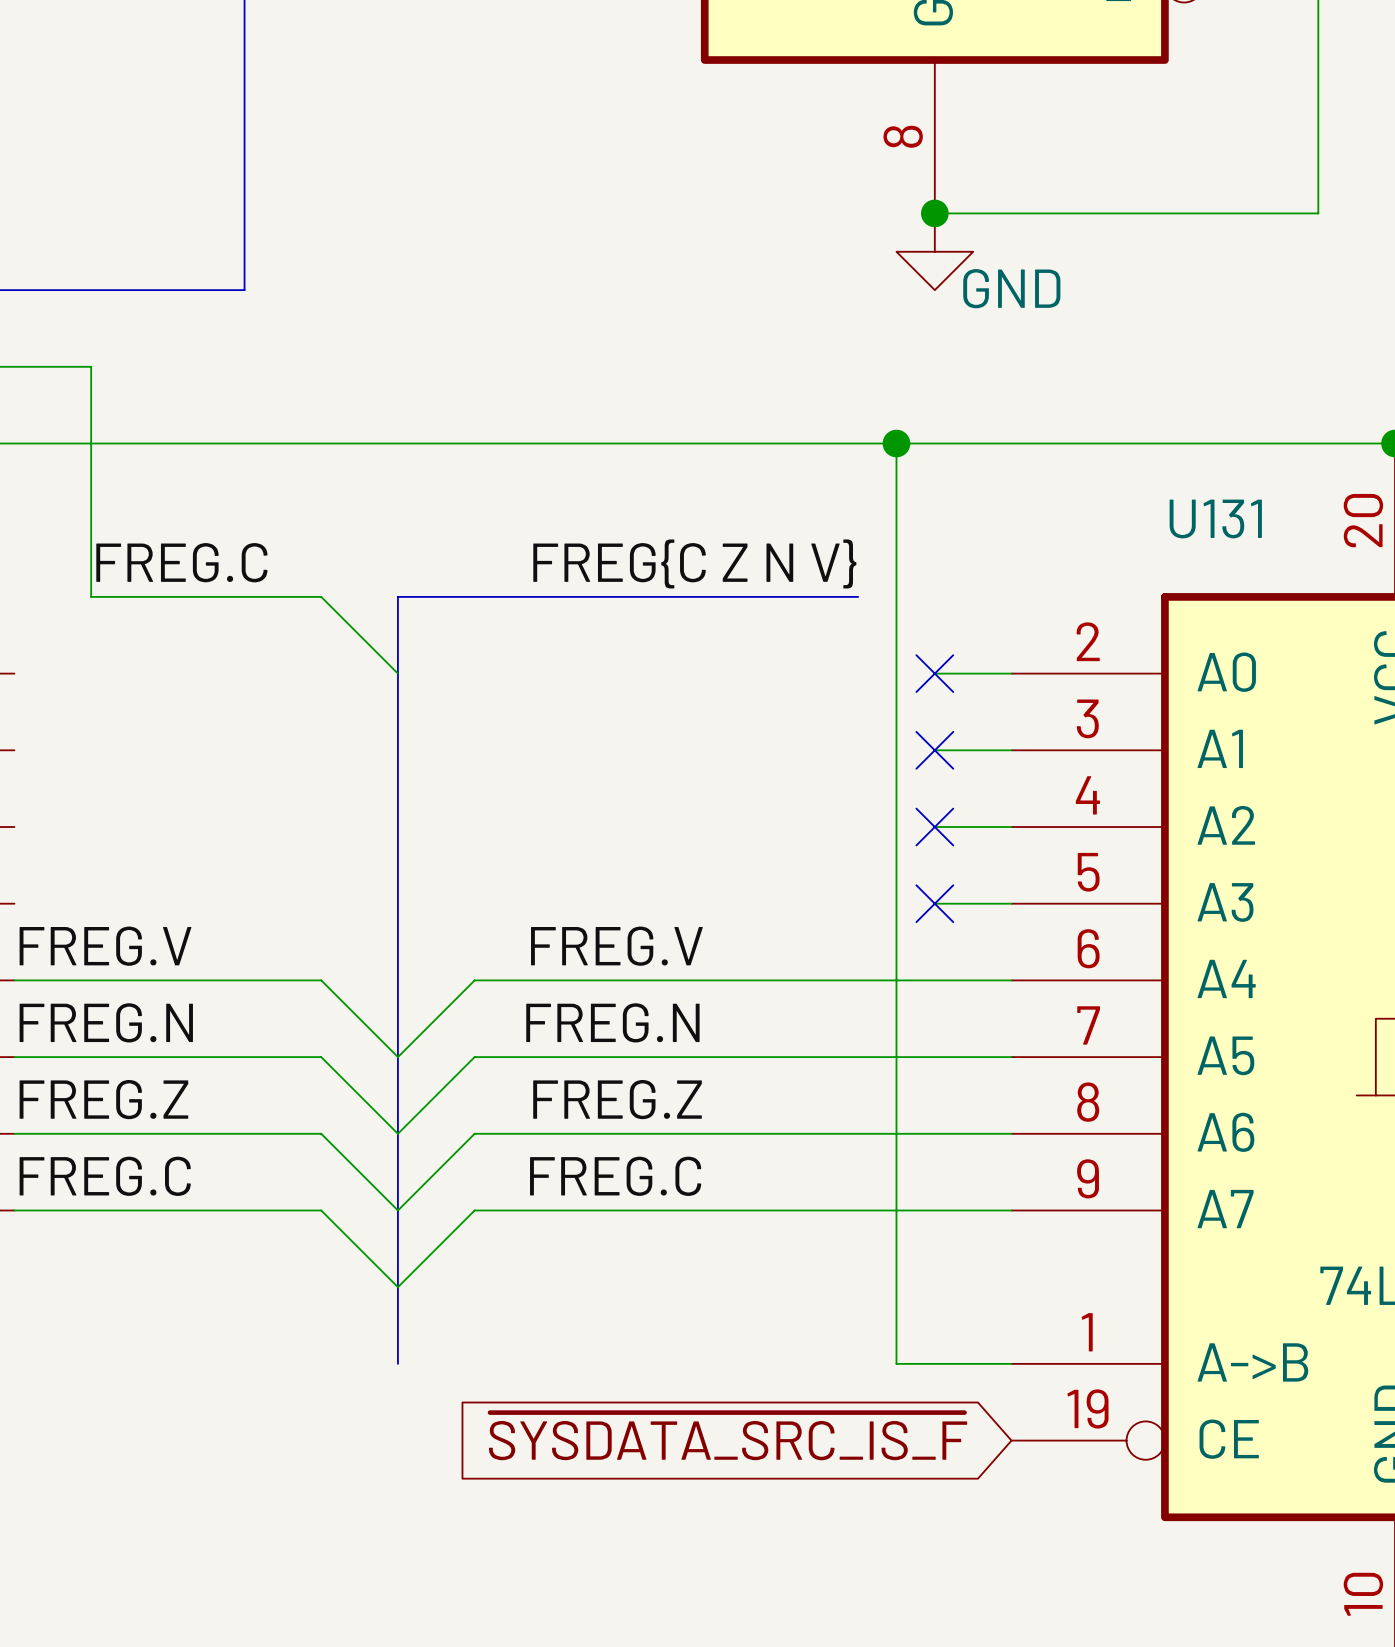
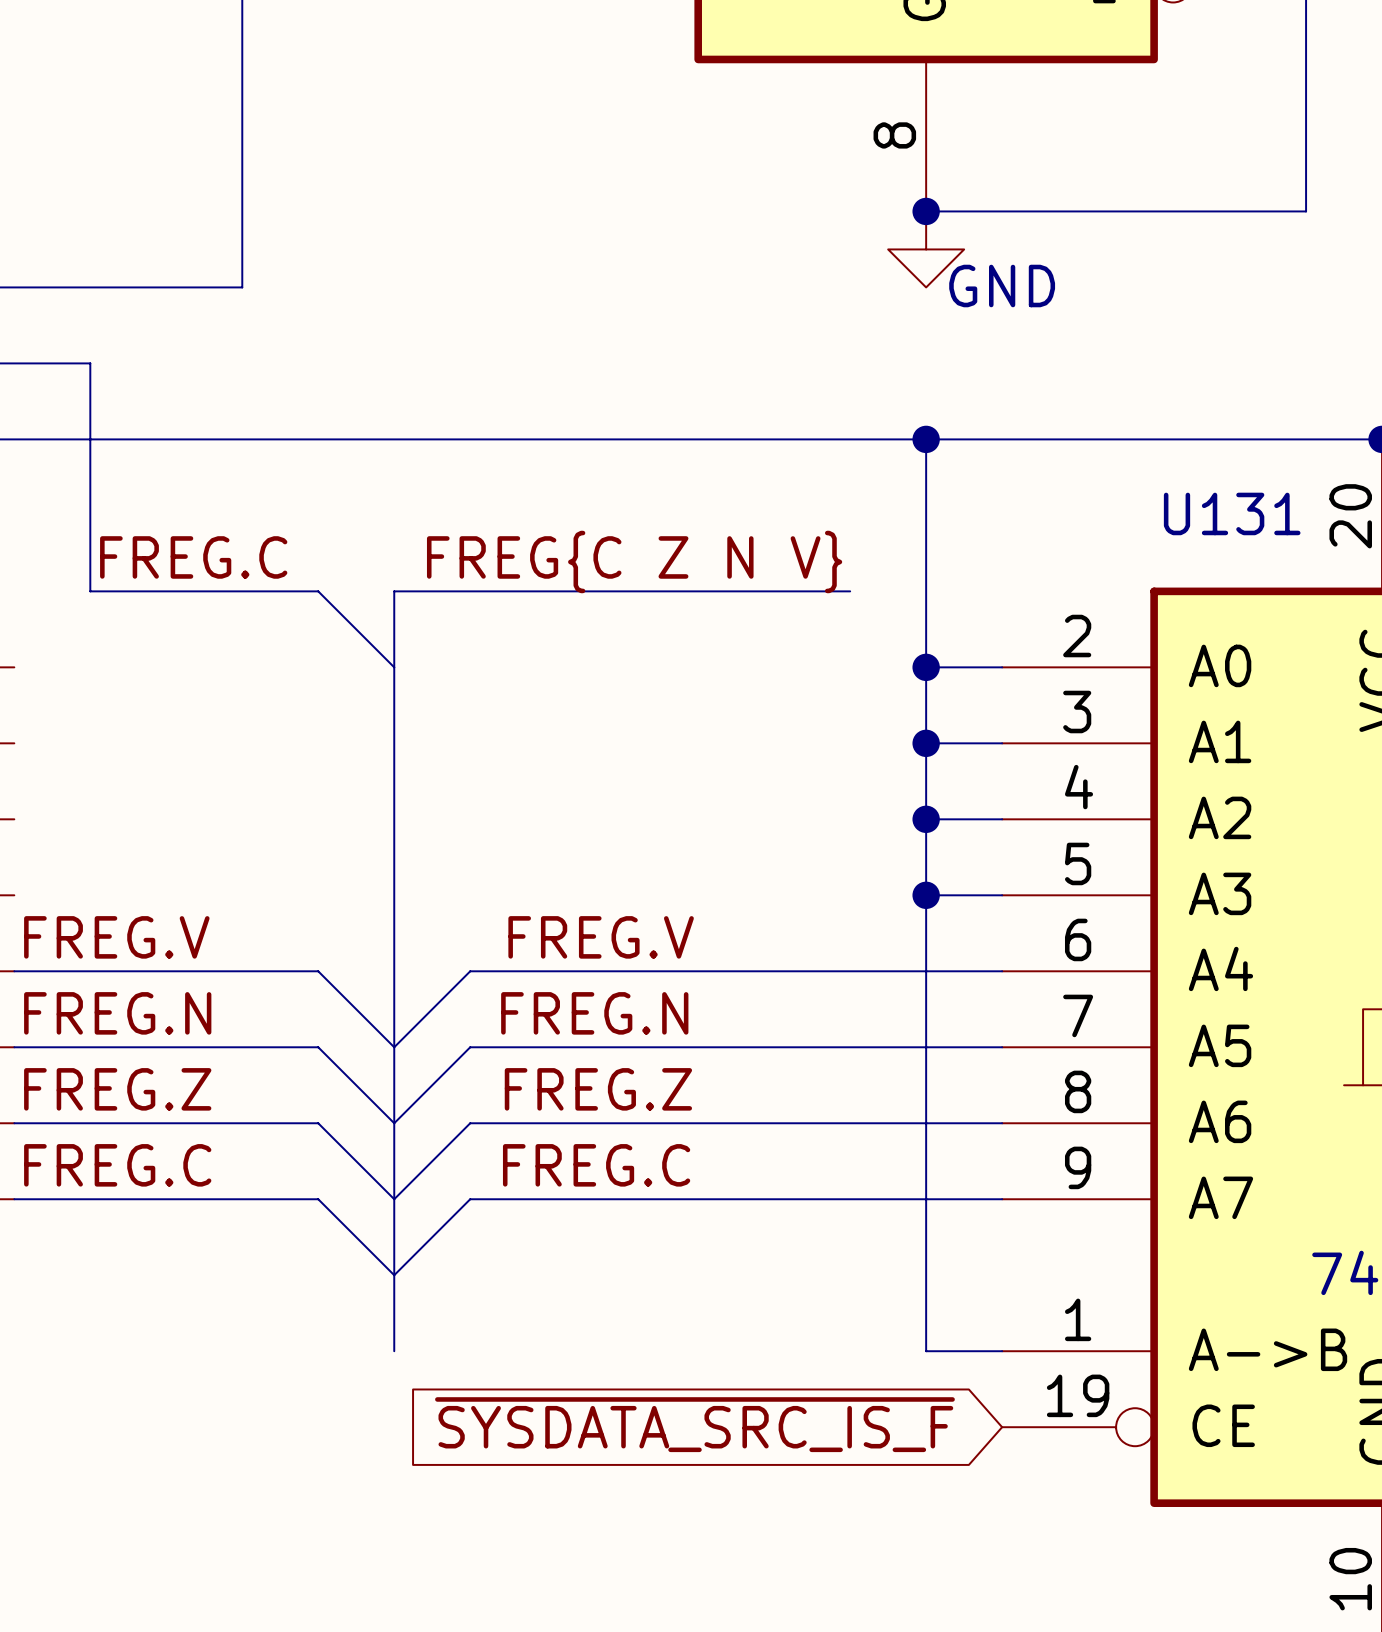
wire: (896, 443) (896, 1363) (934, 1363) -> (926, 439) (926, 1351)
junction position: (896, 443) -> (926, 439)
junction: none -> (926, 667)
no-connect mark: (934, 673) -> none
junction: none -> (926, 743)
no-connect mark: (934, 750) -> none
junction: none -> (926, 819)
no-connect mark: (934, 827) -> none
junction: none -> (926, 895)
no-connect mark: (934, 903) -> none

